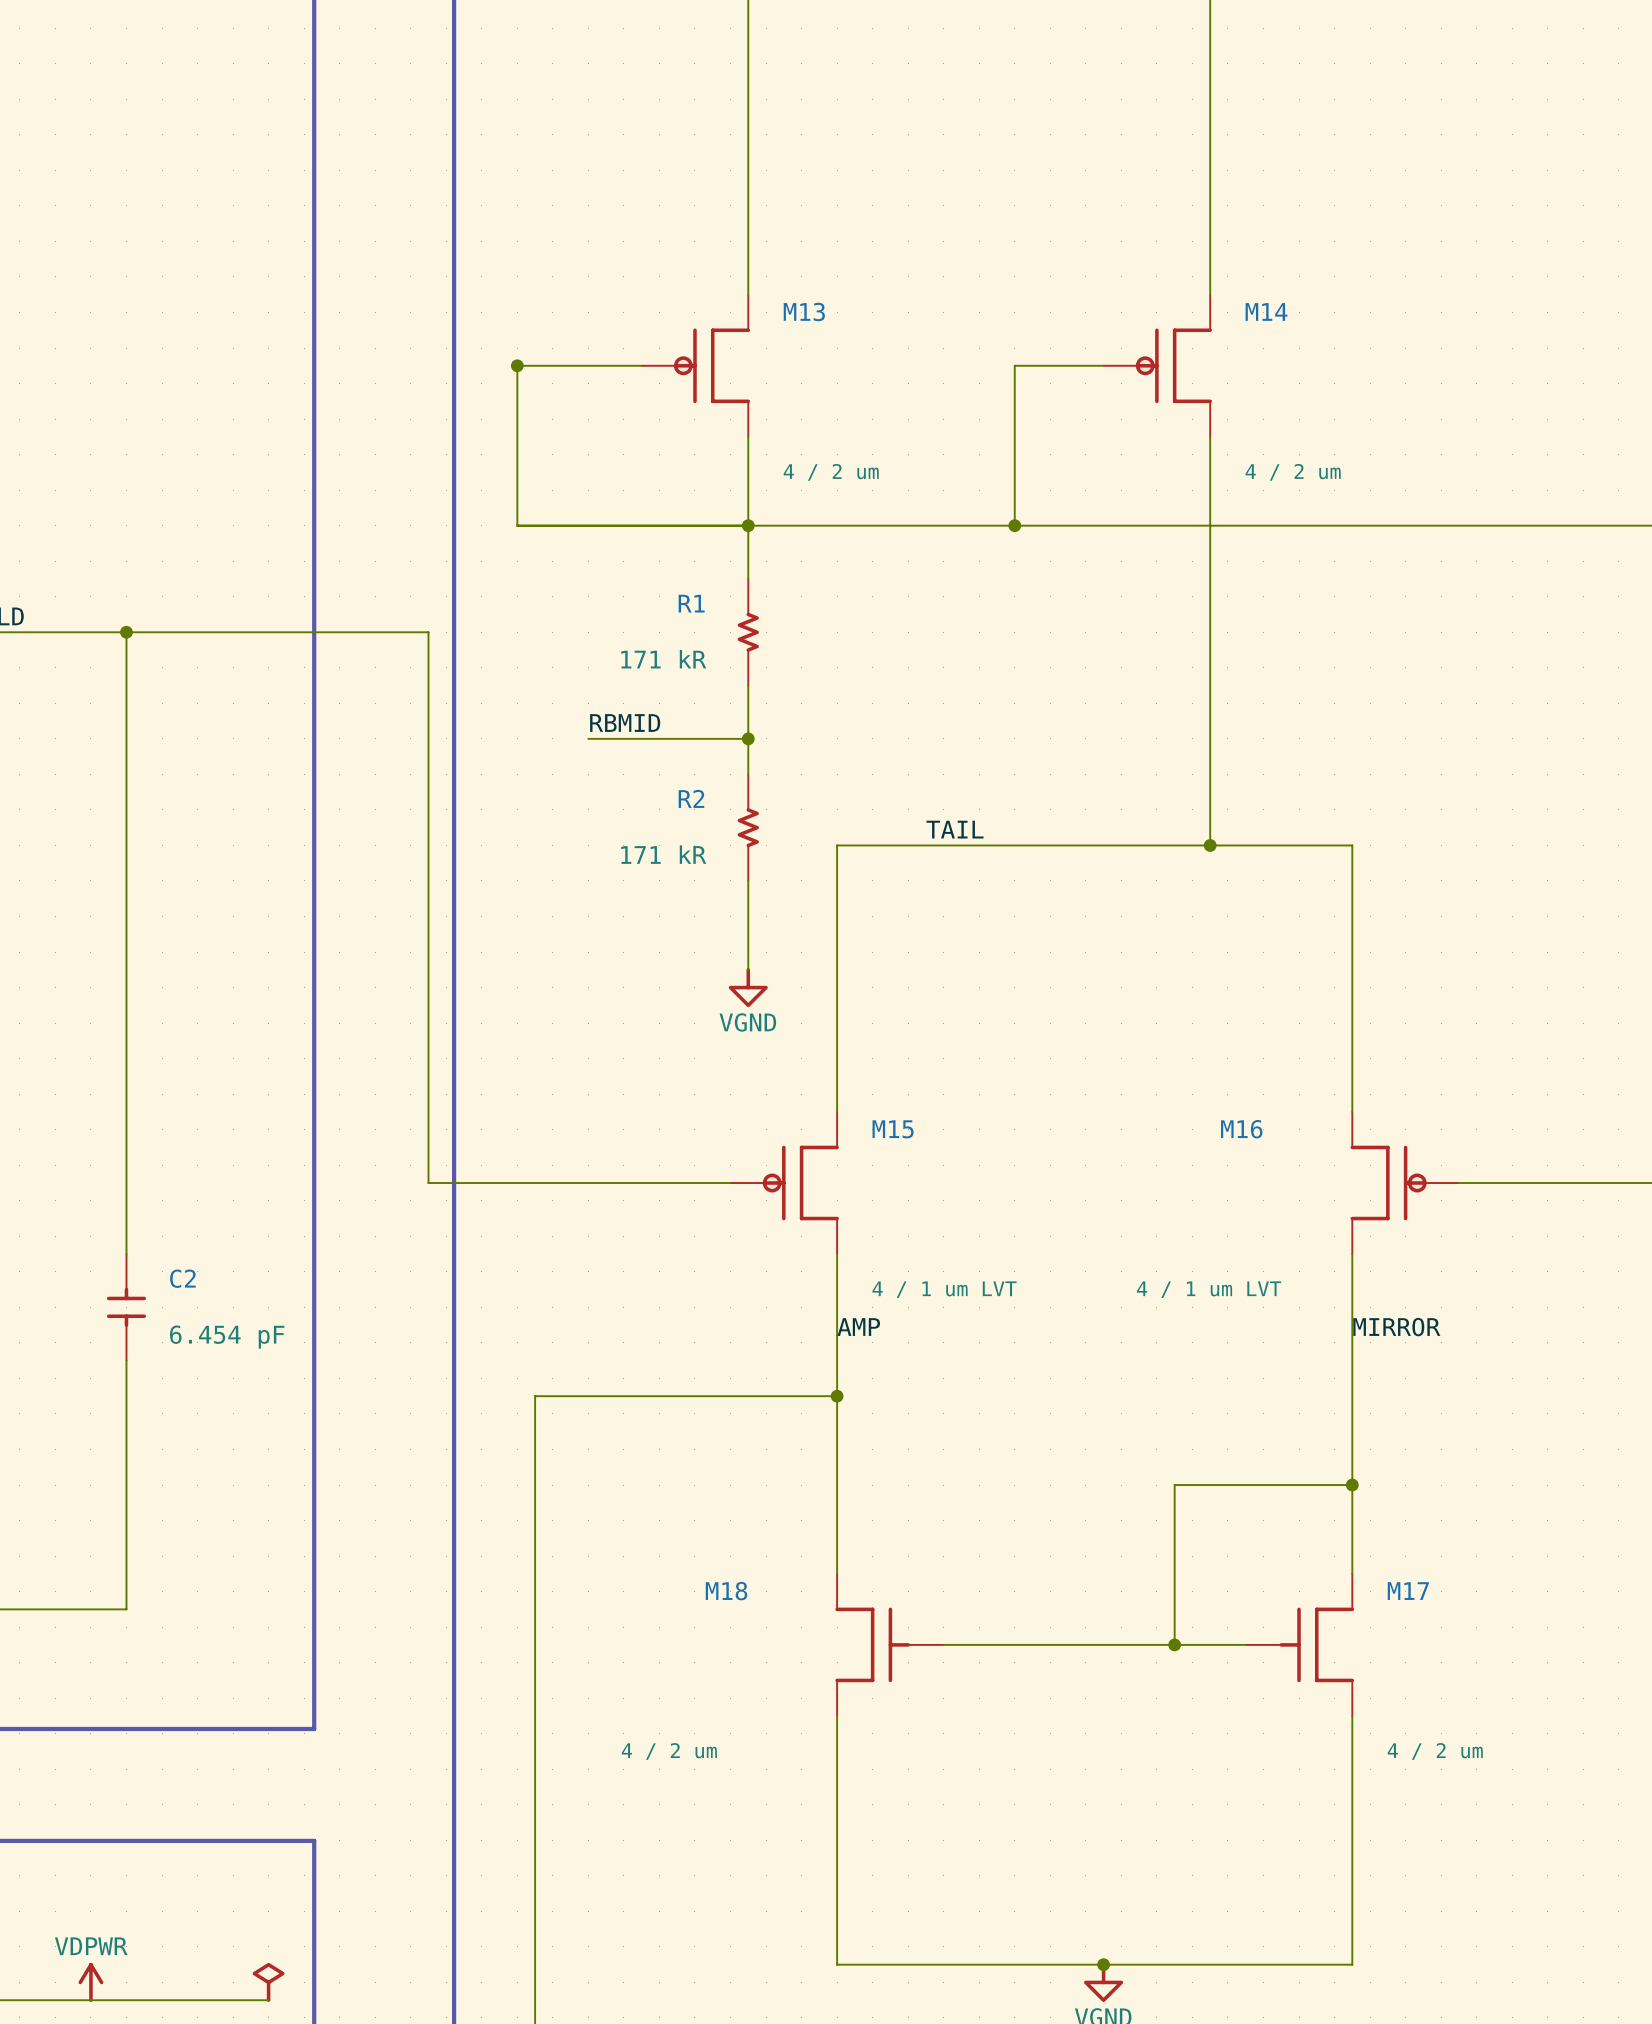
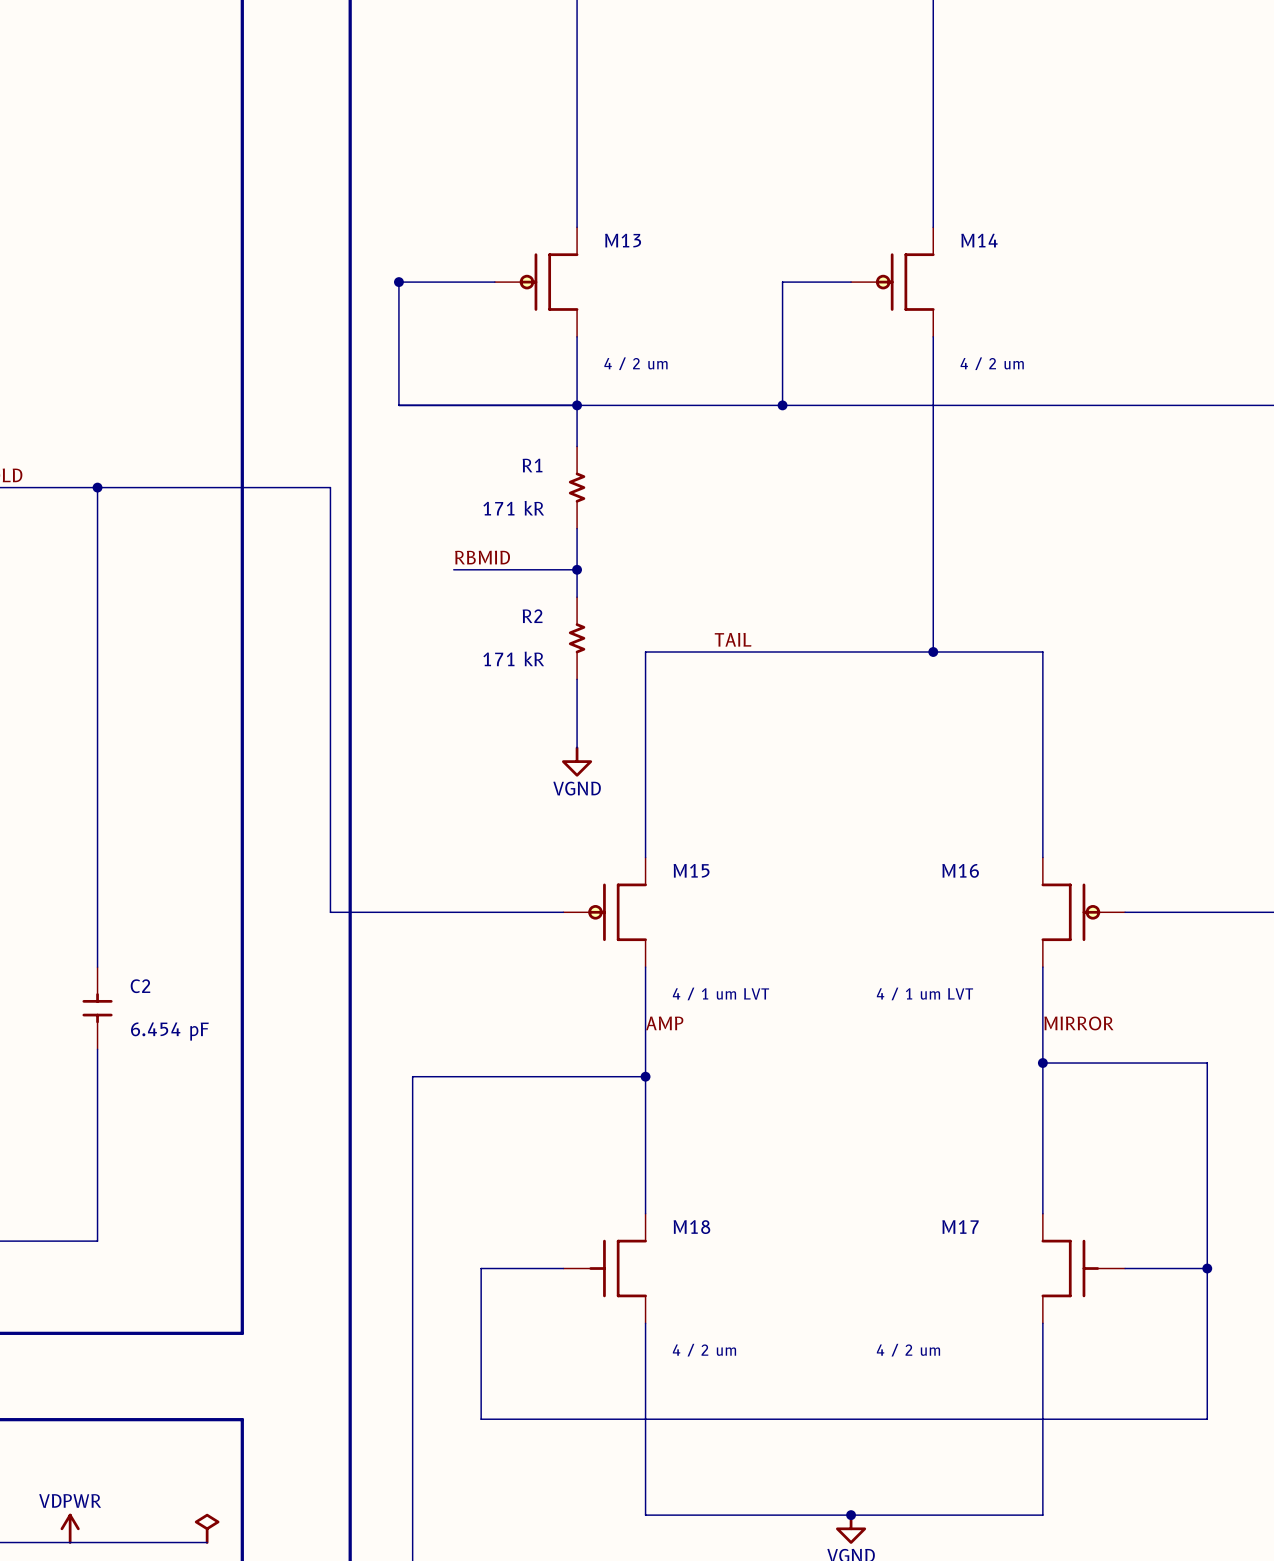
wire: none -> (1042, 1063) (1207, 1063) (1207, 1419) (481, 1419) (481, 1268) (563, 1268)
junction: none -> (1042, 1063)
wire: (1352, 1485) (1174, 1485) (1174, 1644) -> none
junction: (1352, 1485) -> none
M18 name position: M18 (726, 1591) -> M18 (691, 1227)
M17 name position: M17 (1408, 1591) -> M17 (960, 1227)
M18 rotation: 0° (872, 1644) -> 180° (618, 1268)
M18 position: (889, 1644) -> (605, 1268)
wire: (943, 1644) (1245, 1644) -> none
junction: (1174, 1644) -> none
M17 position: (1299, 1644) -> (1083, 1268)
M17 rotation: 0° (1316, 1644) -> 180° (1070, 1268)
wire: none -> (1125, 1268) (1207, 1268)
junction: none -> (1207, 1268)
M18 value position: 4 / 2 um (669, 1751) -> 4 / 2 um (704, 1350)
M17 value position: 4 / 2 um (1435, 1751) -> 4 / 2 um (908, 1350)

